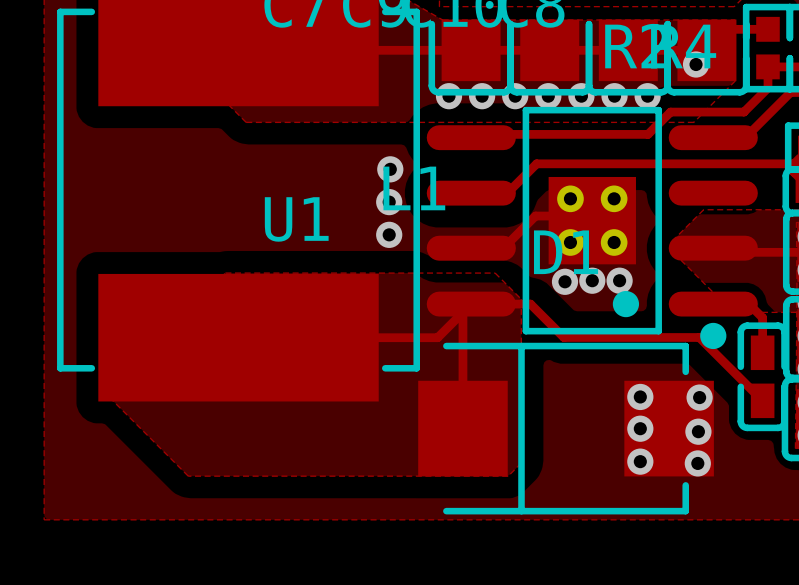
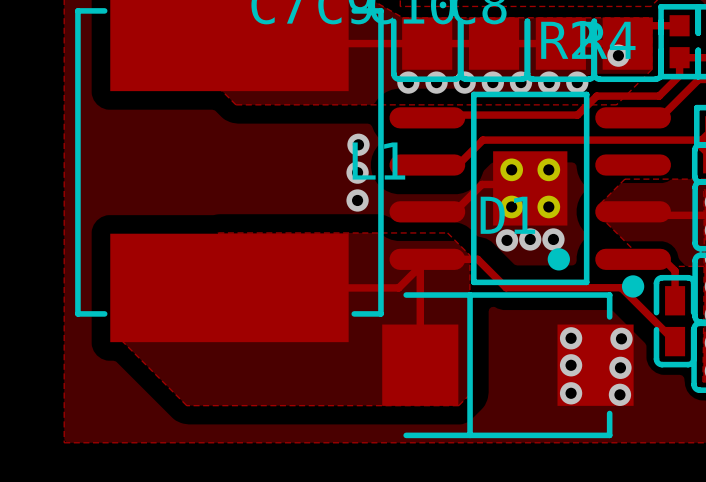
U1 name: U1 (296, 219) -> none

